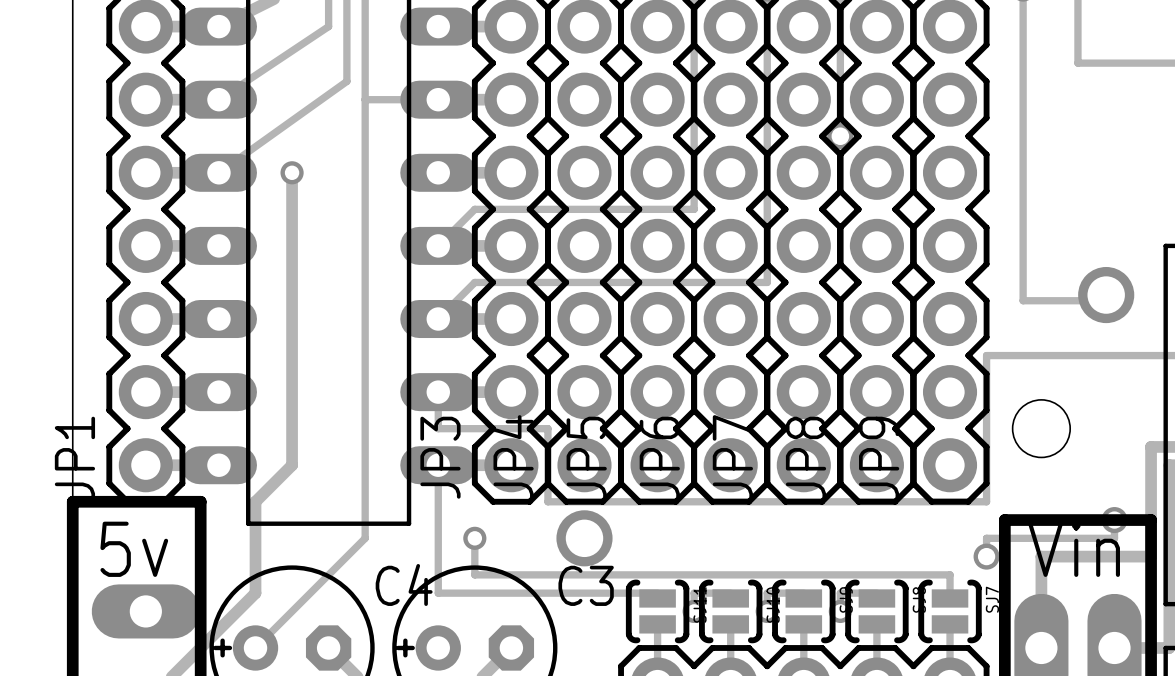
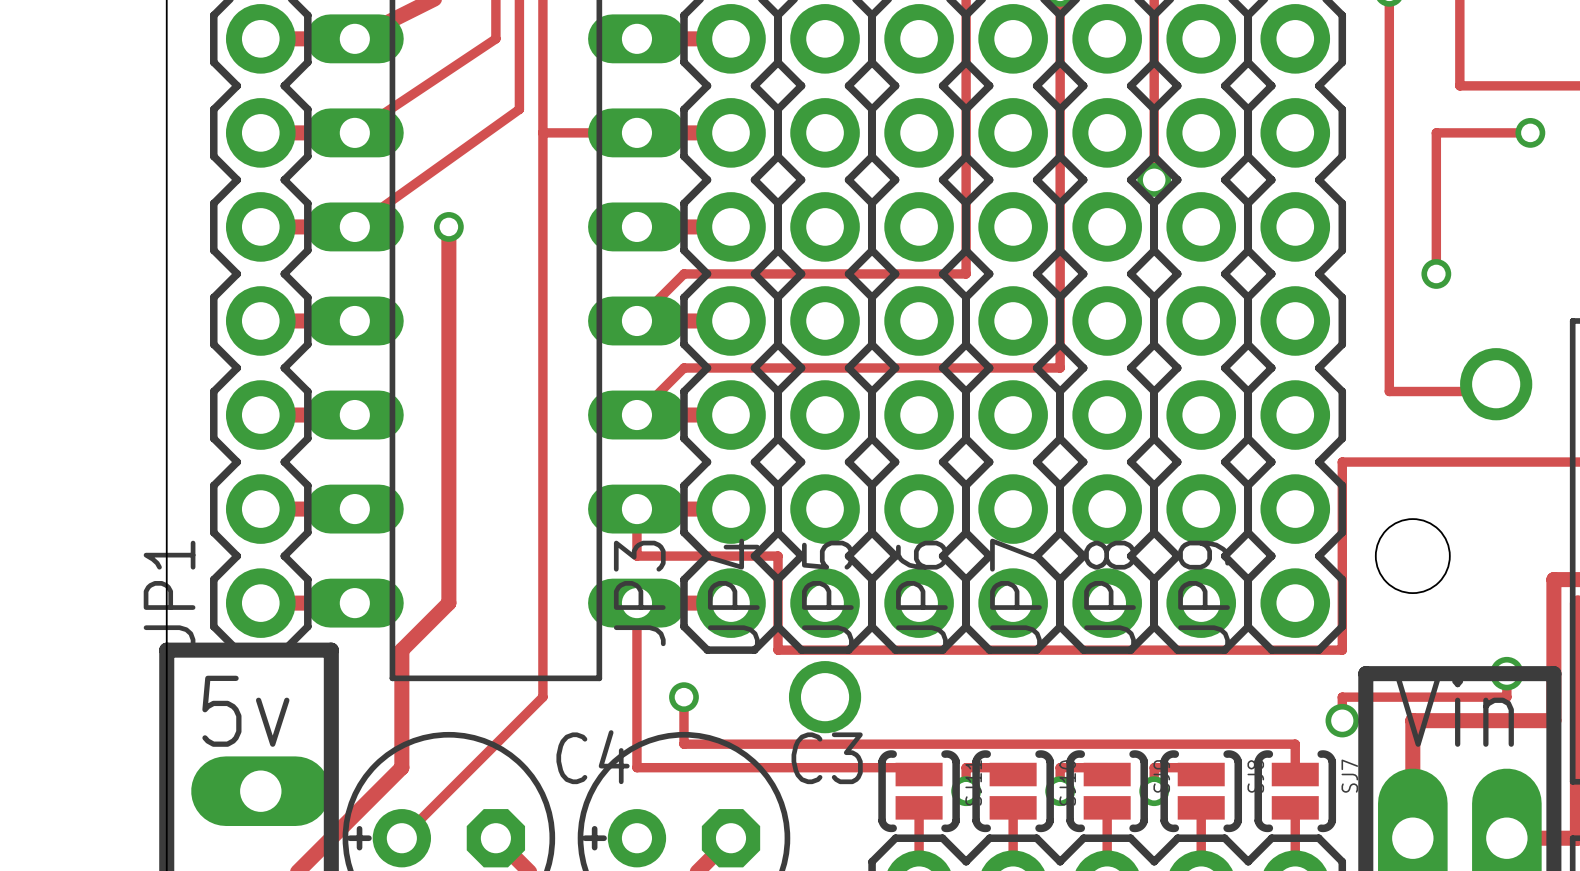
track: none -> (1530, 132) (1436, 132) (1436, 273)
via: none -> (1530, 132)
via: none -> (1436, 273)

